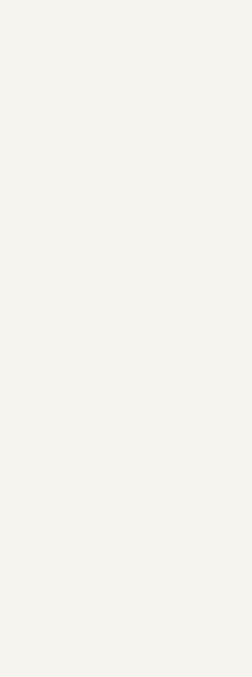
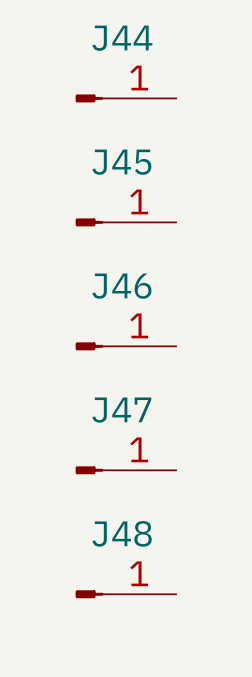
J44: none -> (125, 98)
J45: none -> (125, 222)
J46: none -> (125, 346)
J47: none -> (125, 470)
J48: none -> (125, 594)

